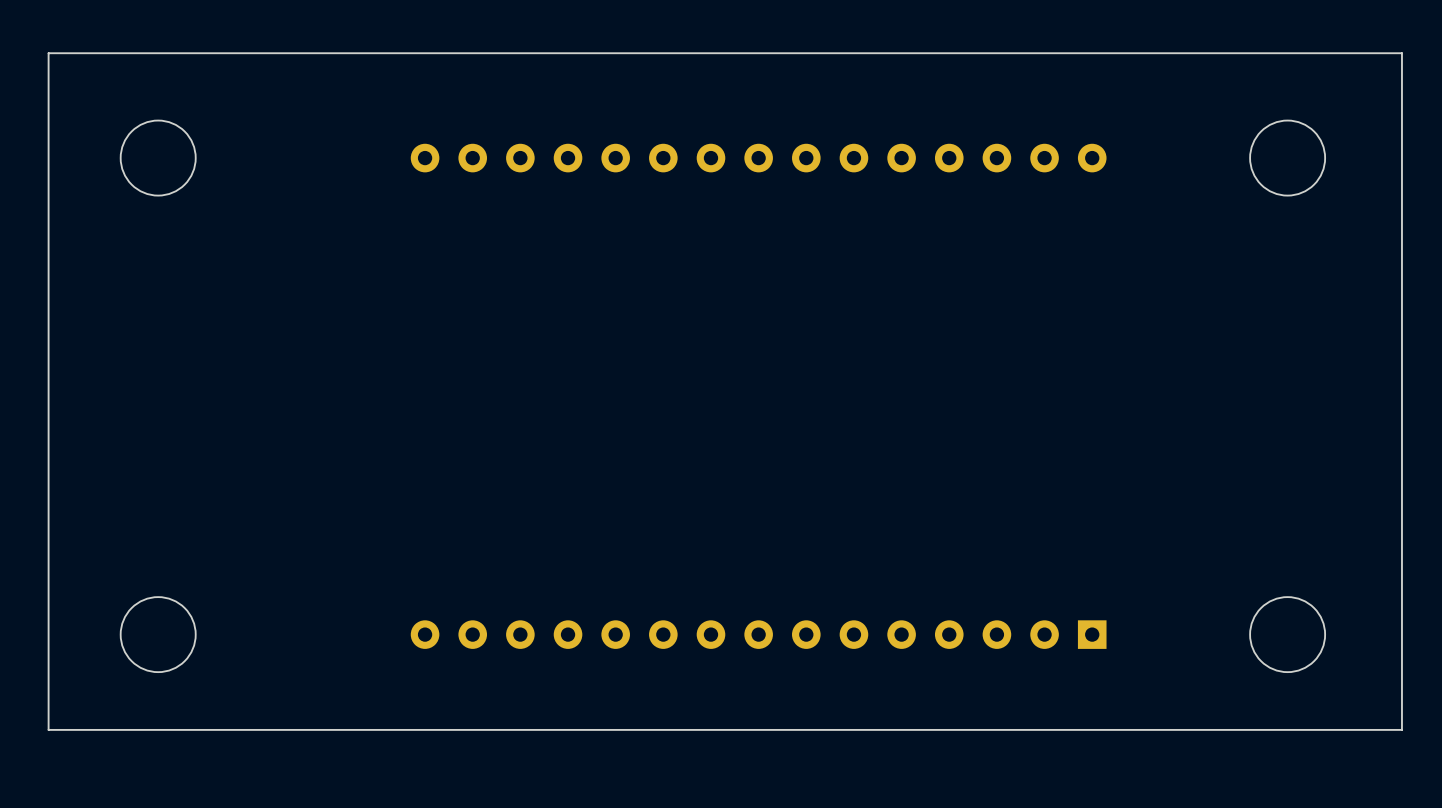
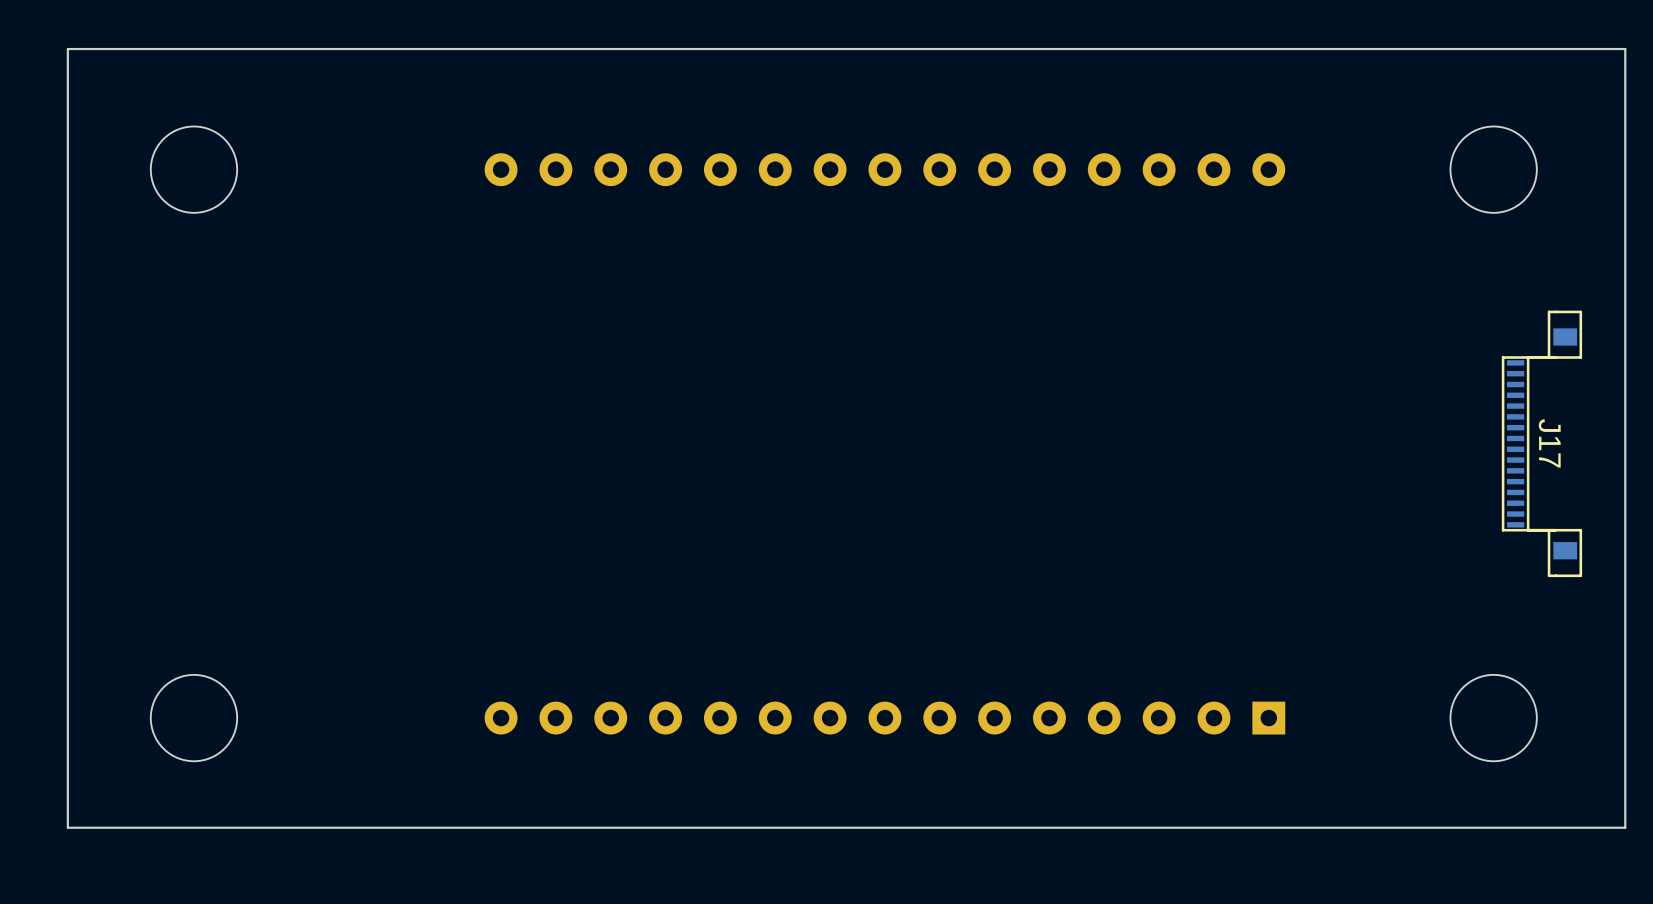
J17: none -> (1541, 443)

